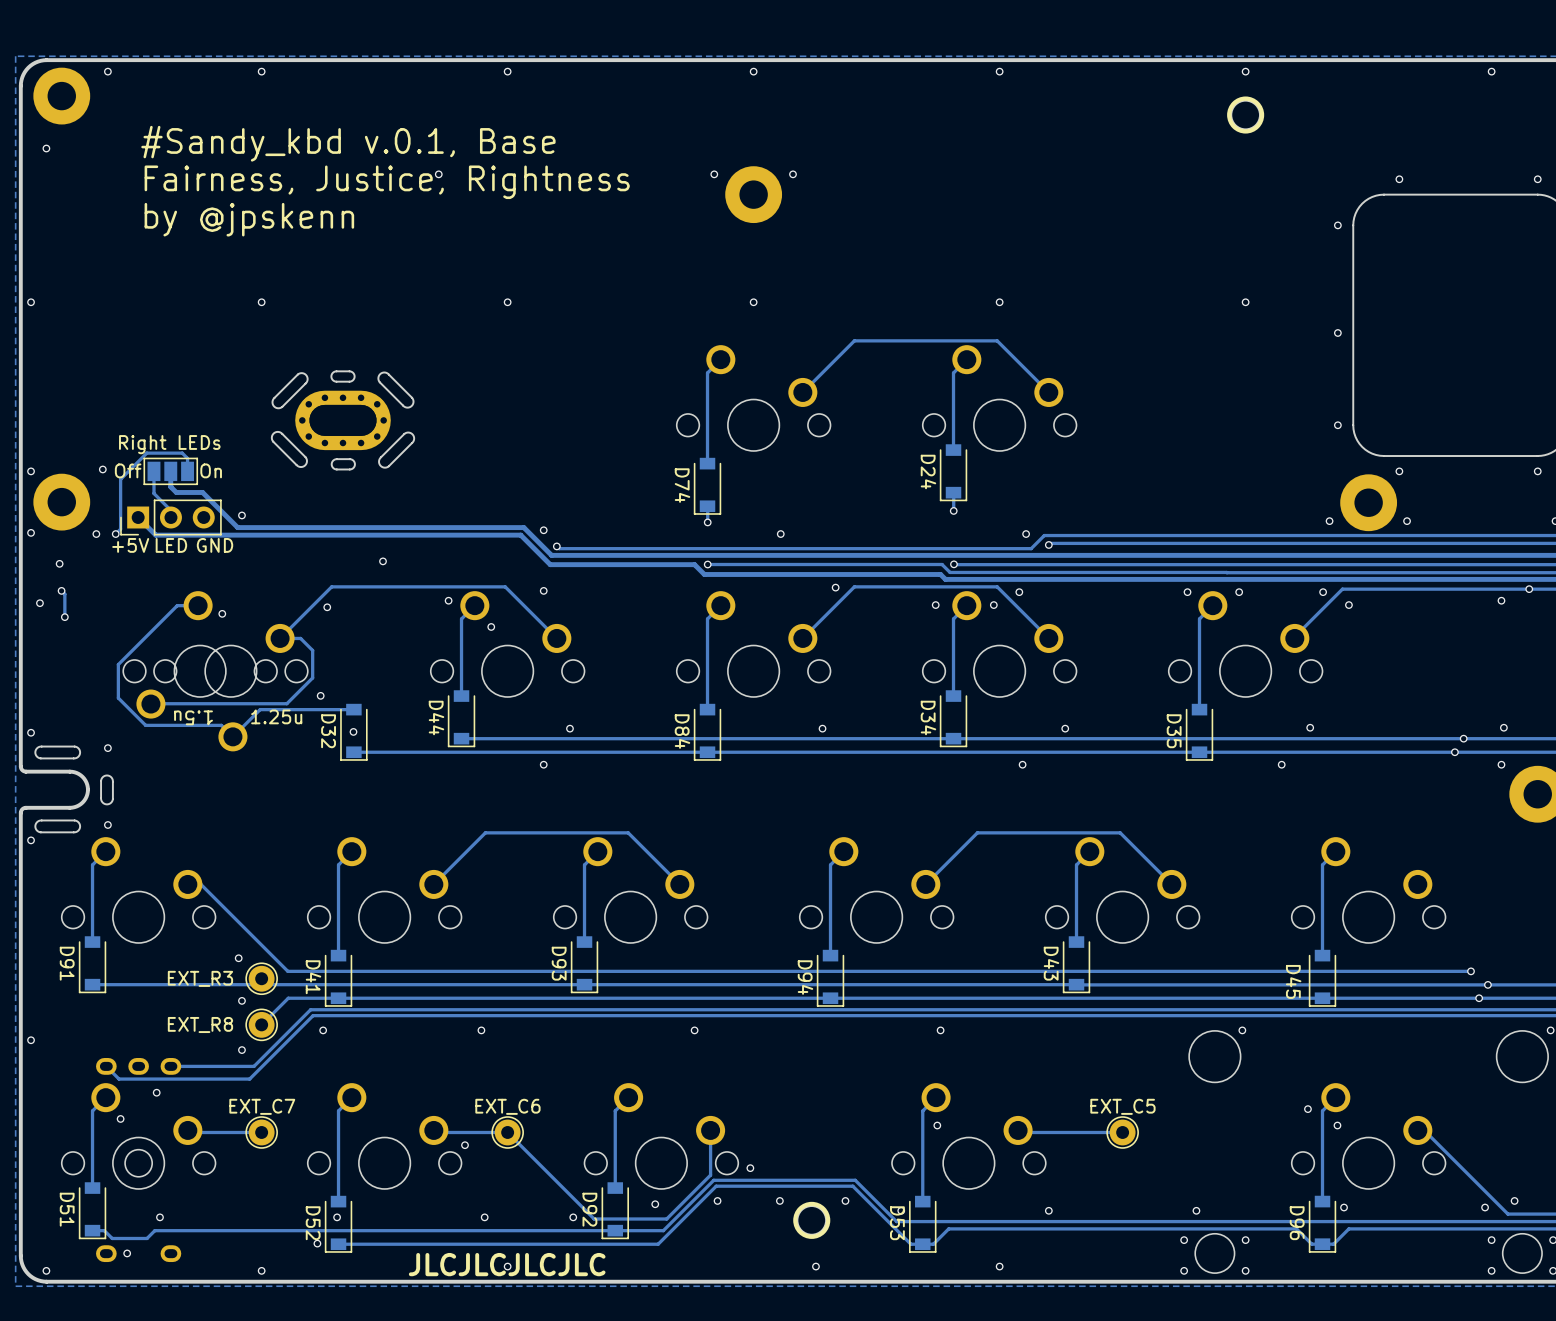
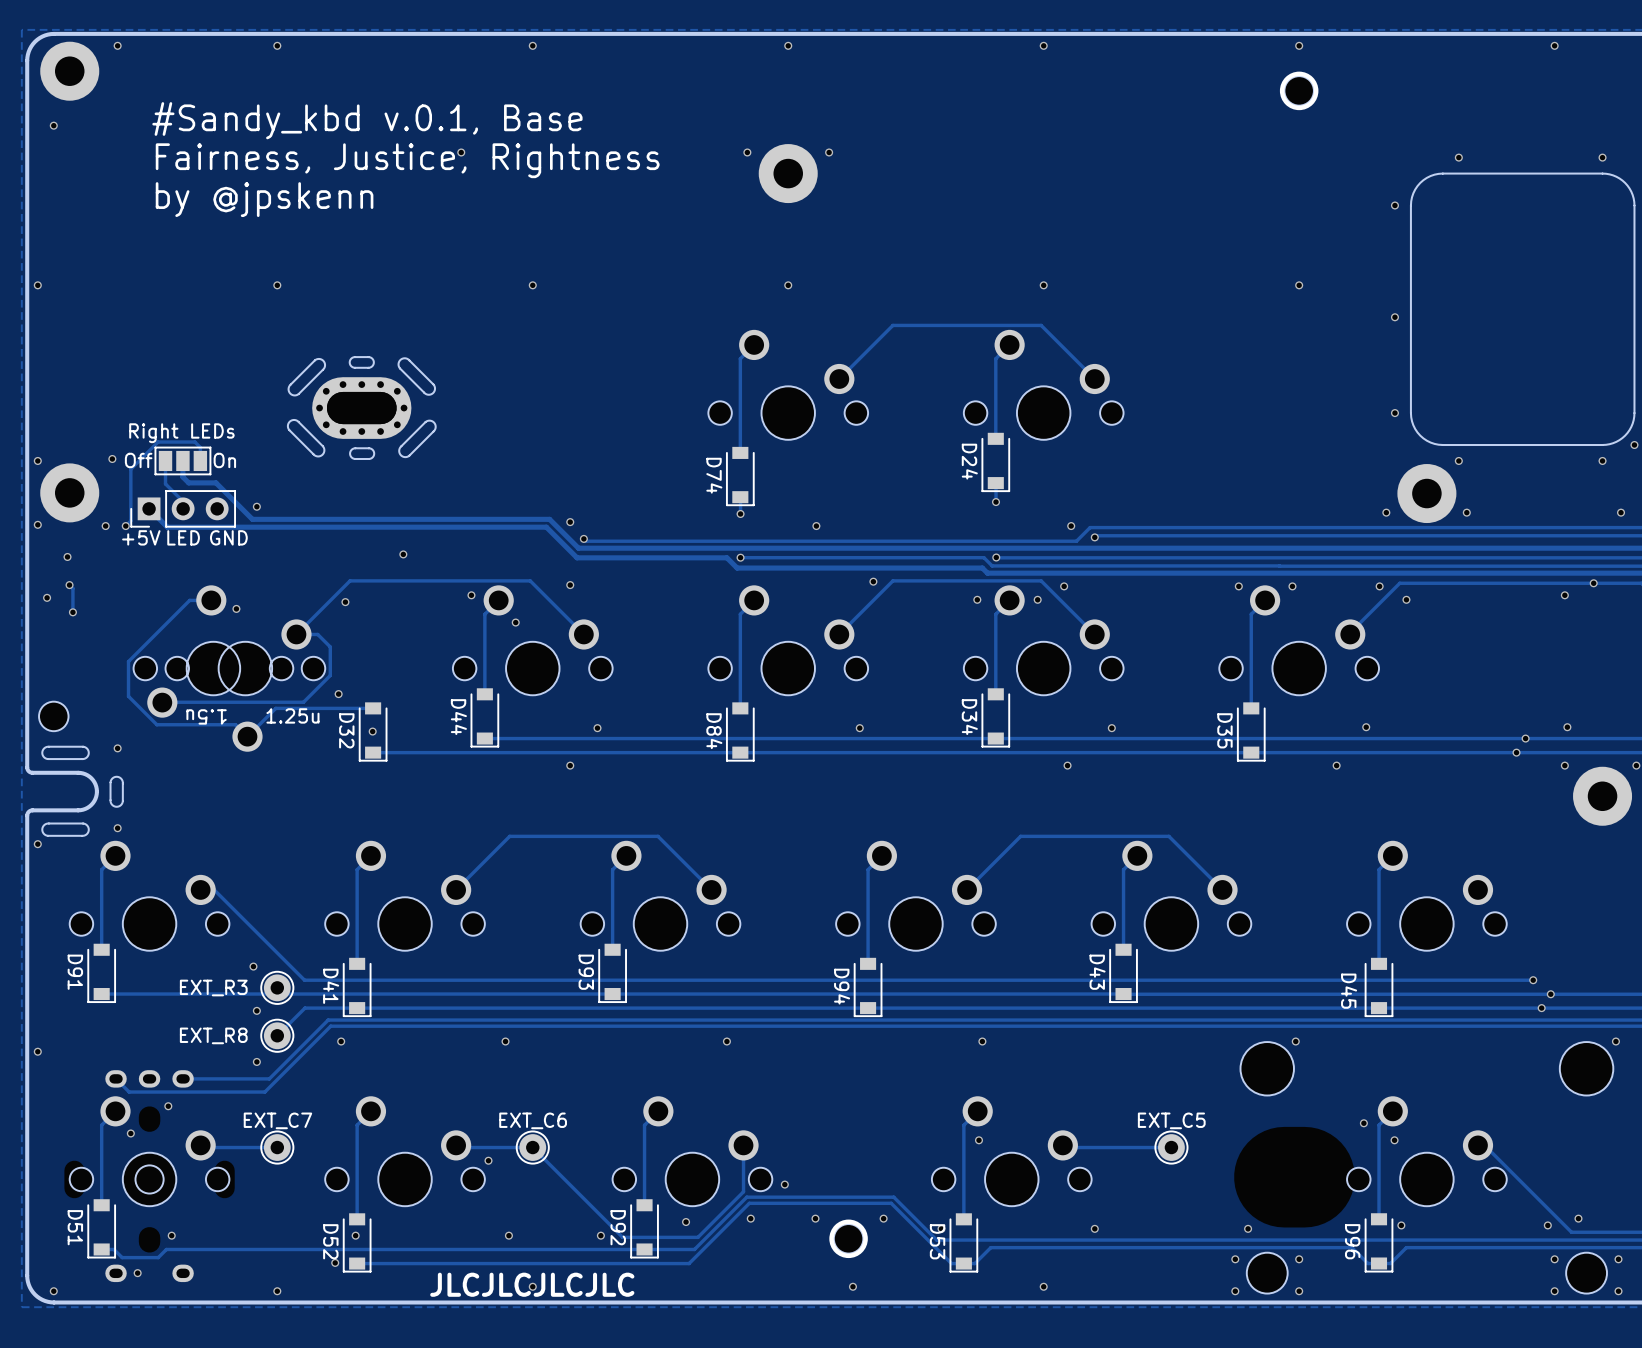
part: none -> (53, 716)
via: (31, 732) -> none

